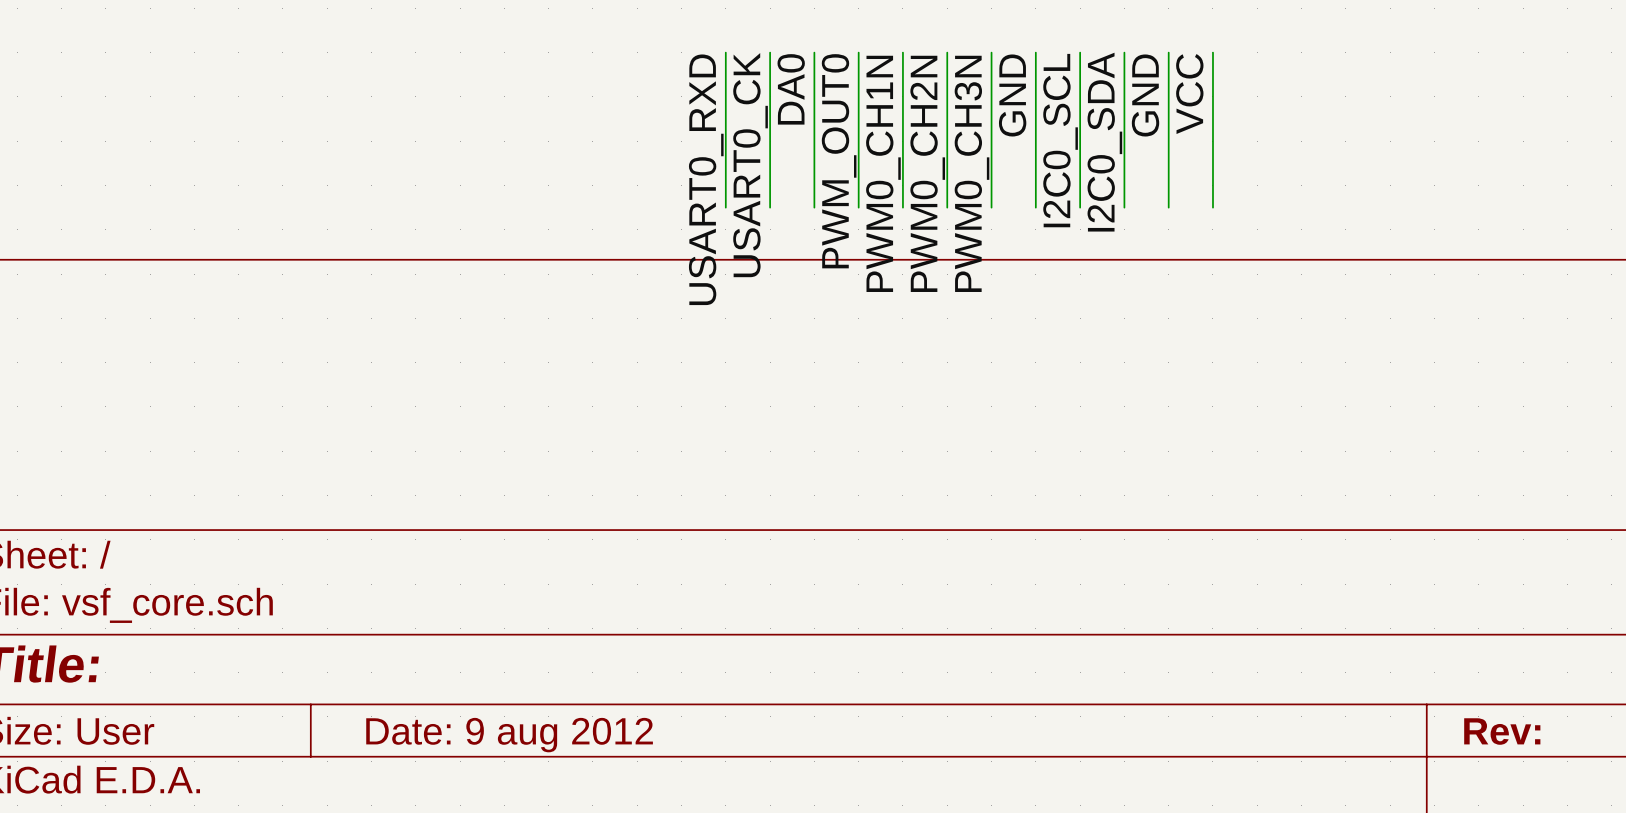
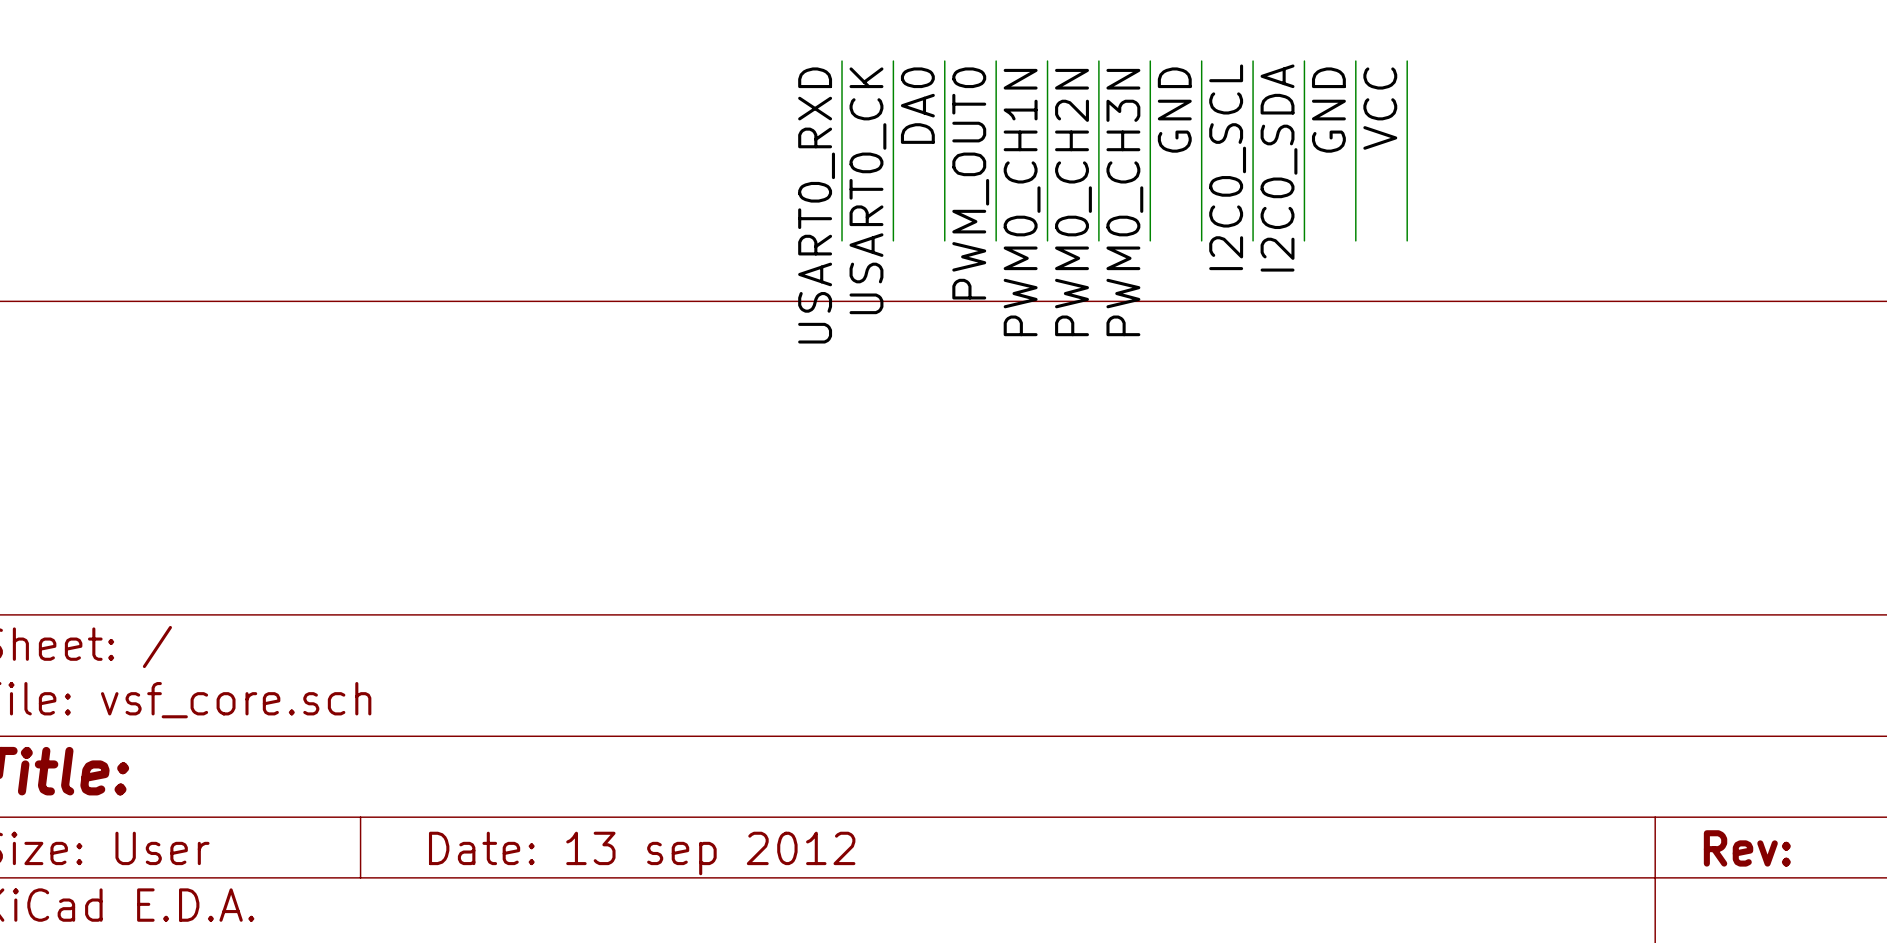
title block: Date: 9 aug 2012 (509, 735) -> Date: 13 sep 2012 (642, 853)

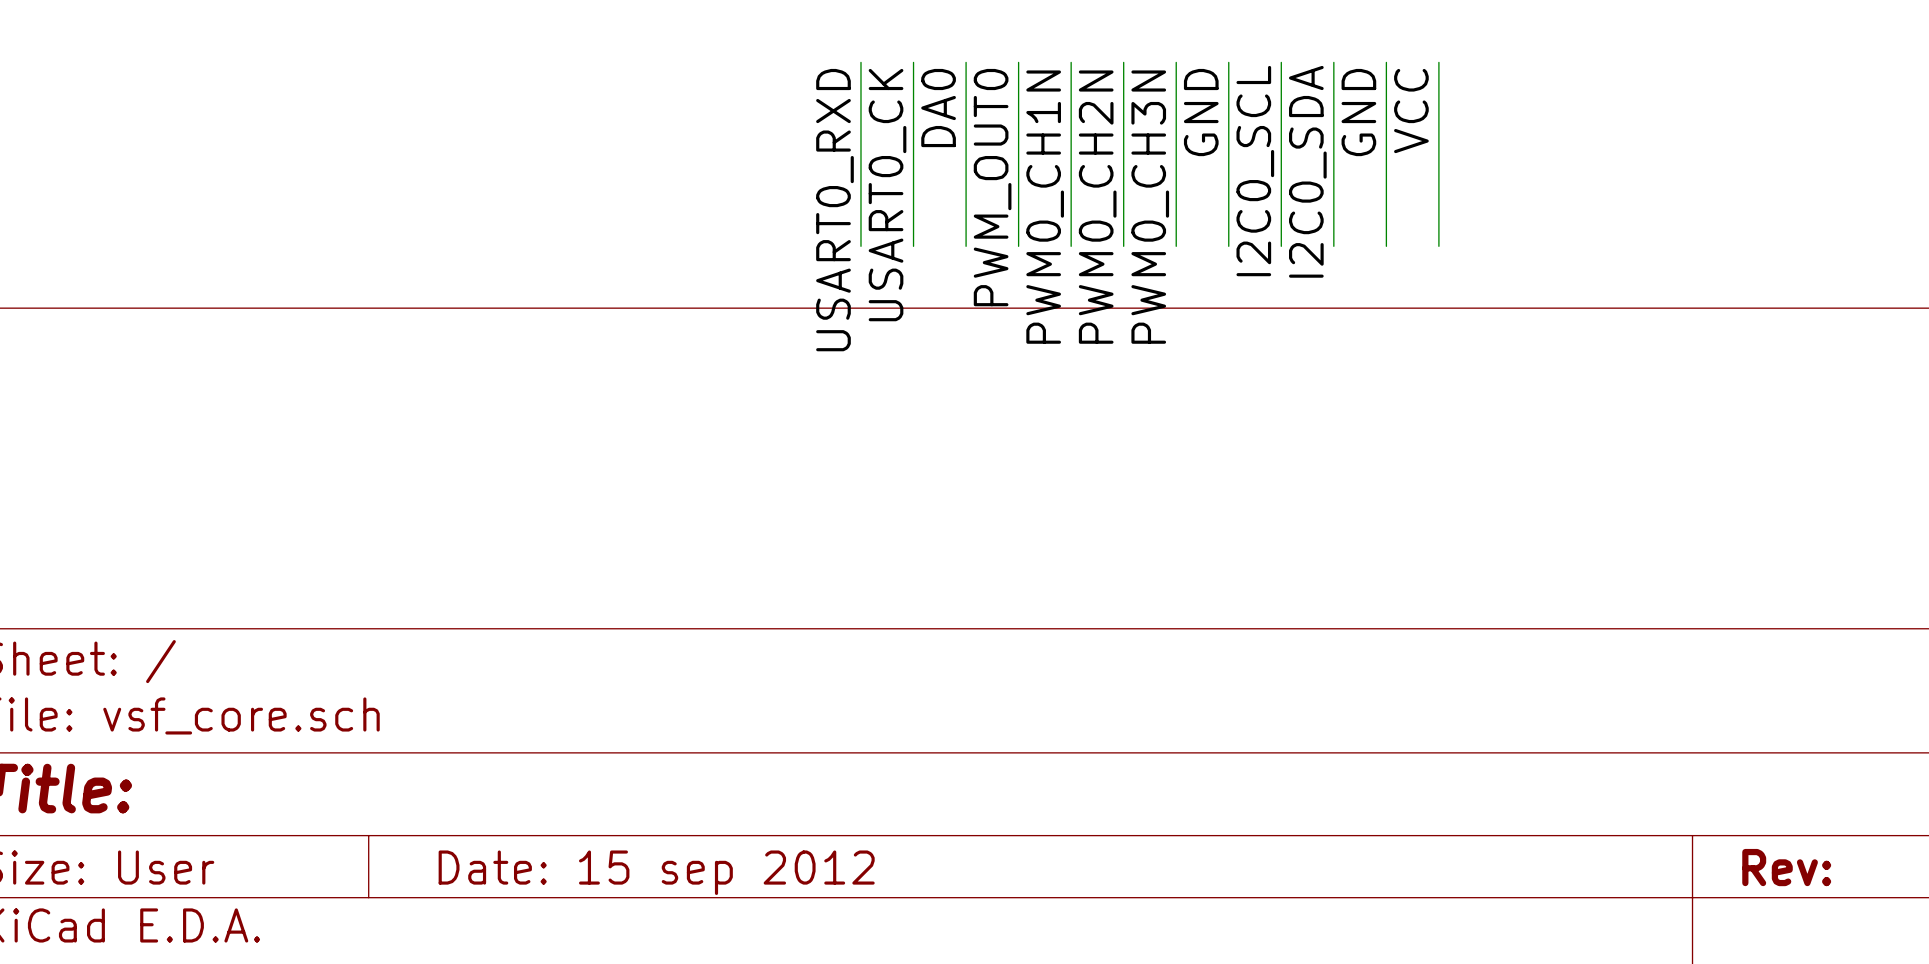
title block: Date: 13 sep 2012 (642, 853) -> Date: 15 sep 2012 (656, 872)

